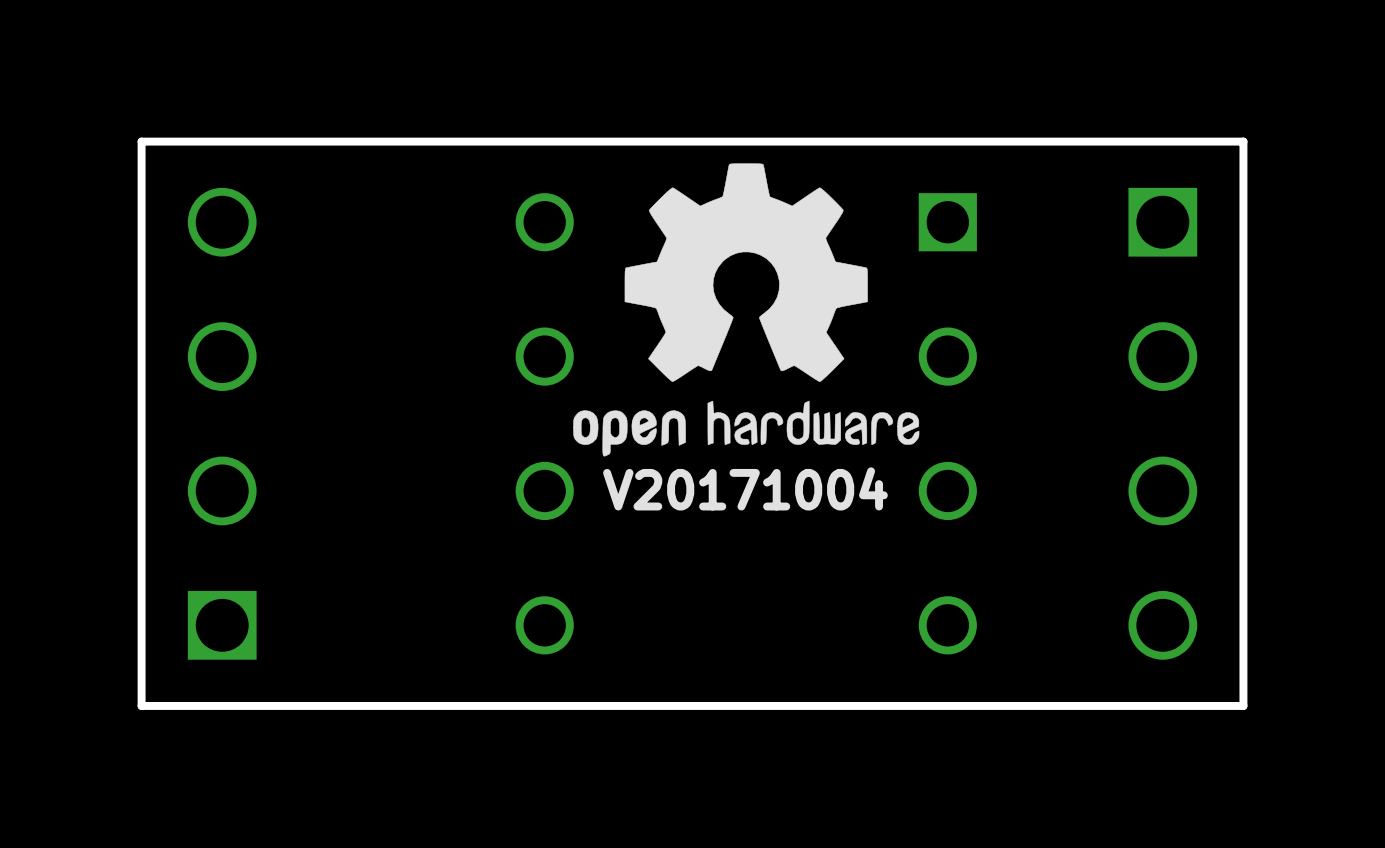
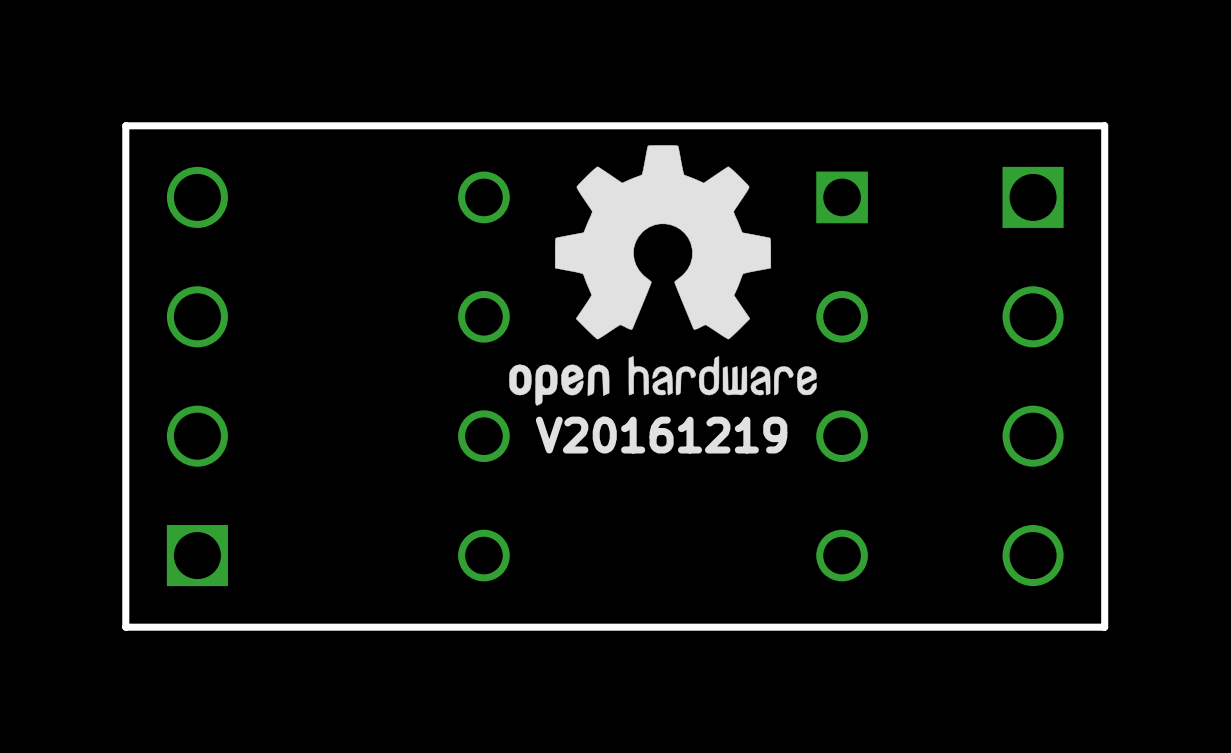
text: V20171004 (745, 488) -> V20161219 (661, 435)

